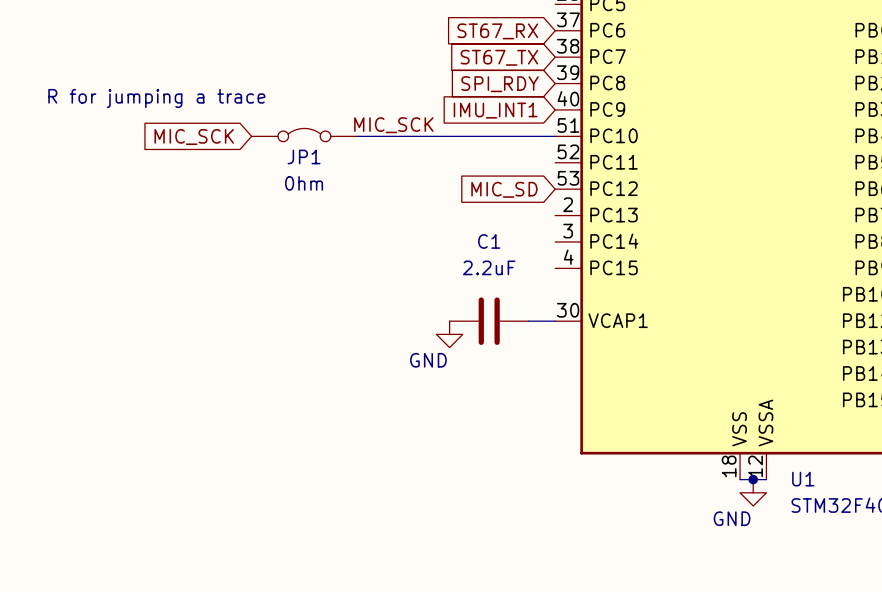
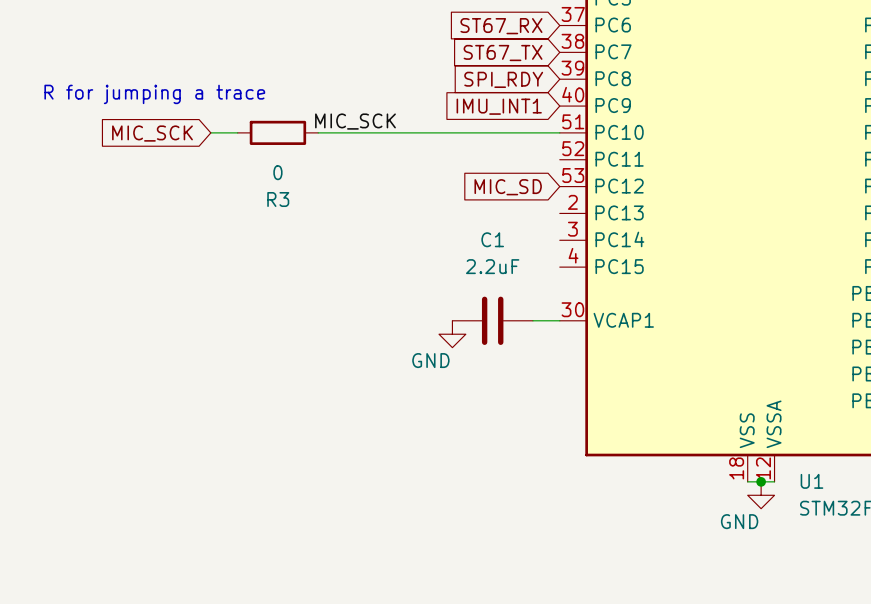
label position: MIC_SCK (393, 125) -> MIC_SCK (355, 121)
JP1: 0hm (304, 135) -> none
global label position: MIC_SCK (194, 136) -> MIC_SCK (152, 133)
wire: none -> (210, 132) (237, 132)
R3: none -> 0 (277, 132)

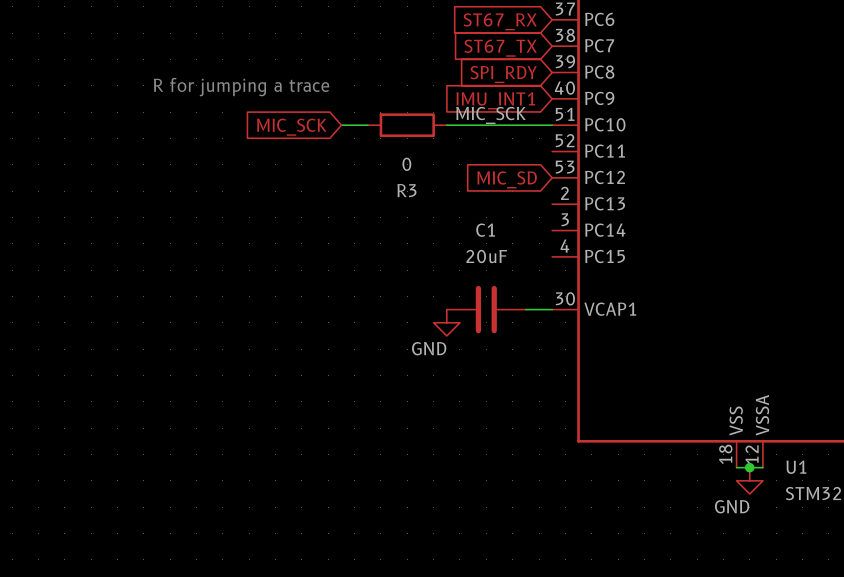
text position: R for jumping a trace (154, 94) -> R for jumping a trace (241, 87)
label position: MIC_SCK (355, 121) -> MIC_SCK (491, 115)
wire: (210, 132) (237, 132) -> none
R3 position: (277, 132) -> (407, 125)
wire: (318, 132) (345, 132) -> none
wire: (371, 132) (452, 132) -> none
global label position: MIC_SCK (152, 133) -> MIC_SCK (291, 127)
C1 value: 2.2uF (492, 266) -> 20uF (486, 256)

